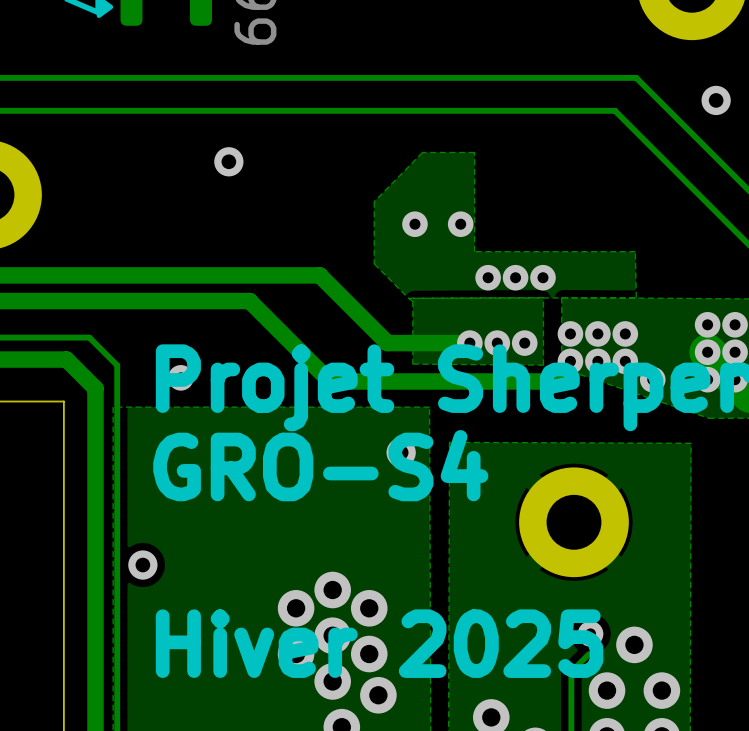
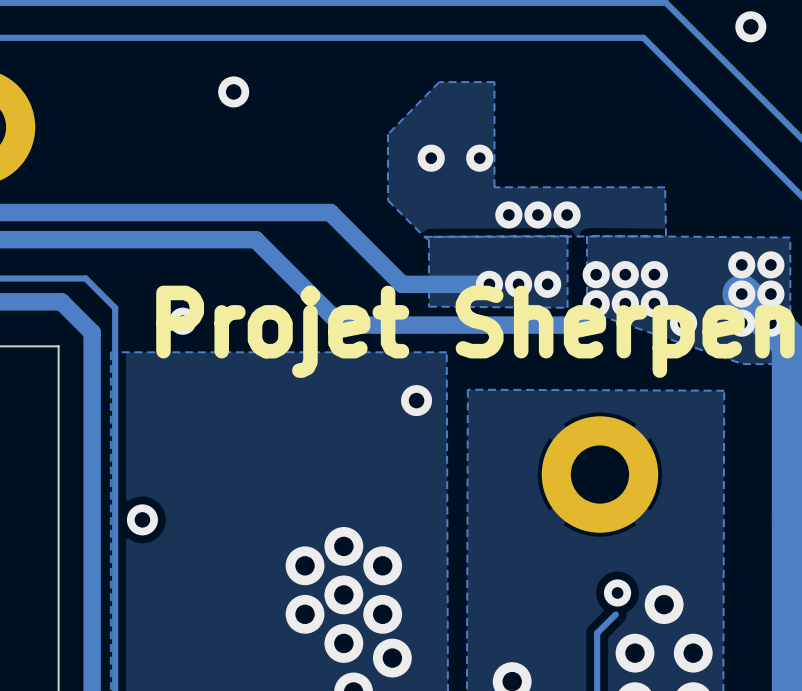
text: GRO-S4 (320, 465) -> none
text: Hiver 2025 (379, 643) -> none

